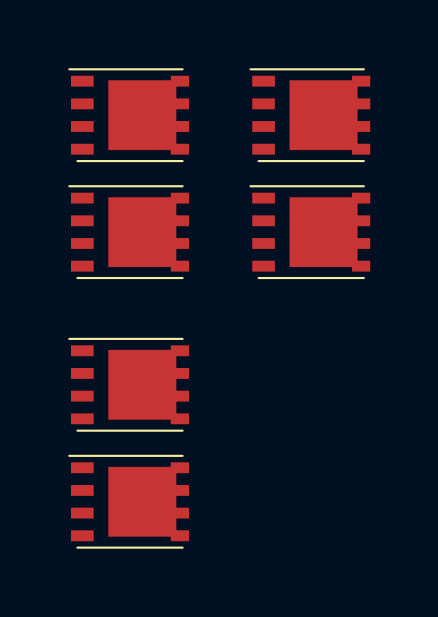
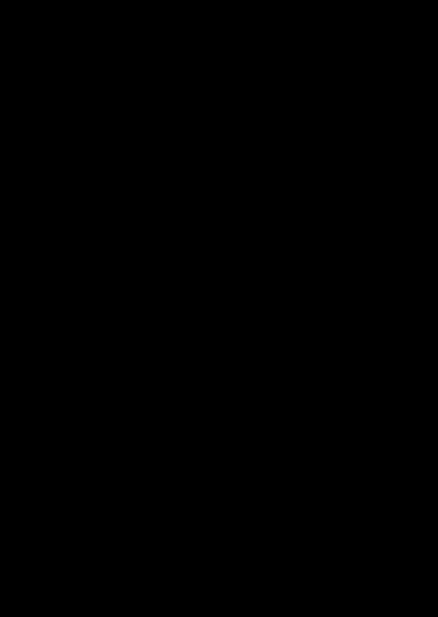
part: (128, 115) -> none
part: (309, 115) -> none
part: (128, 232) -> none
part: (309, 232) -> none
part: (128, 384) -> none
part: (128, 501) -> none

